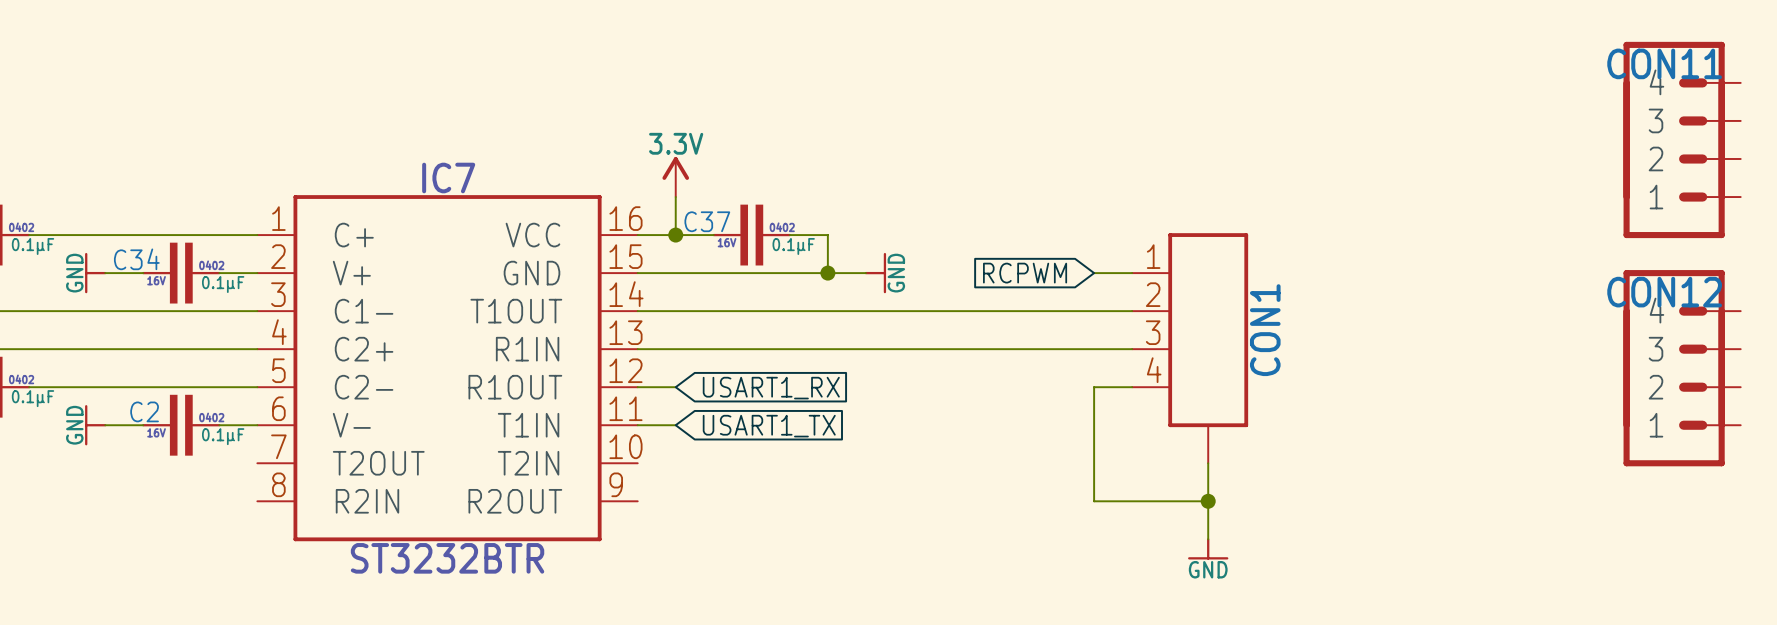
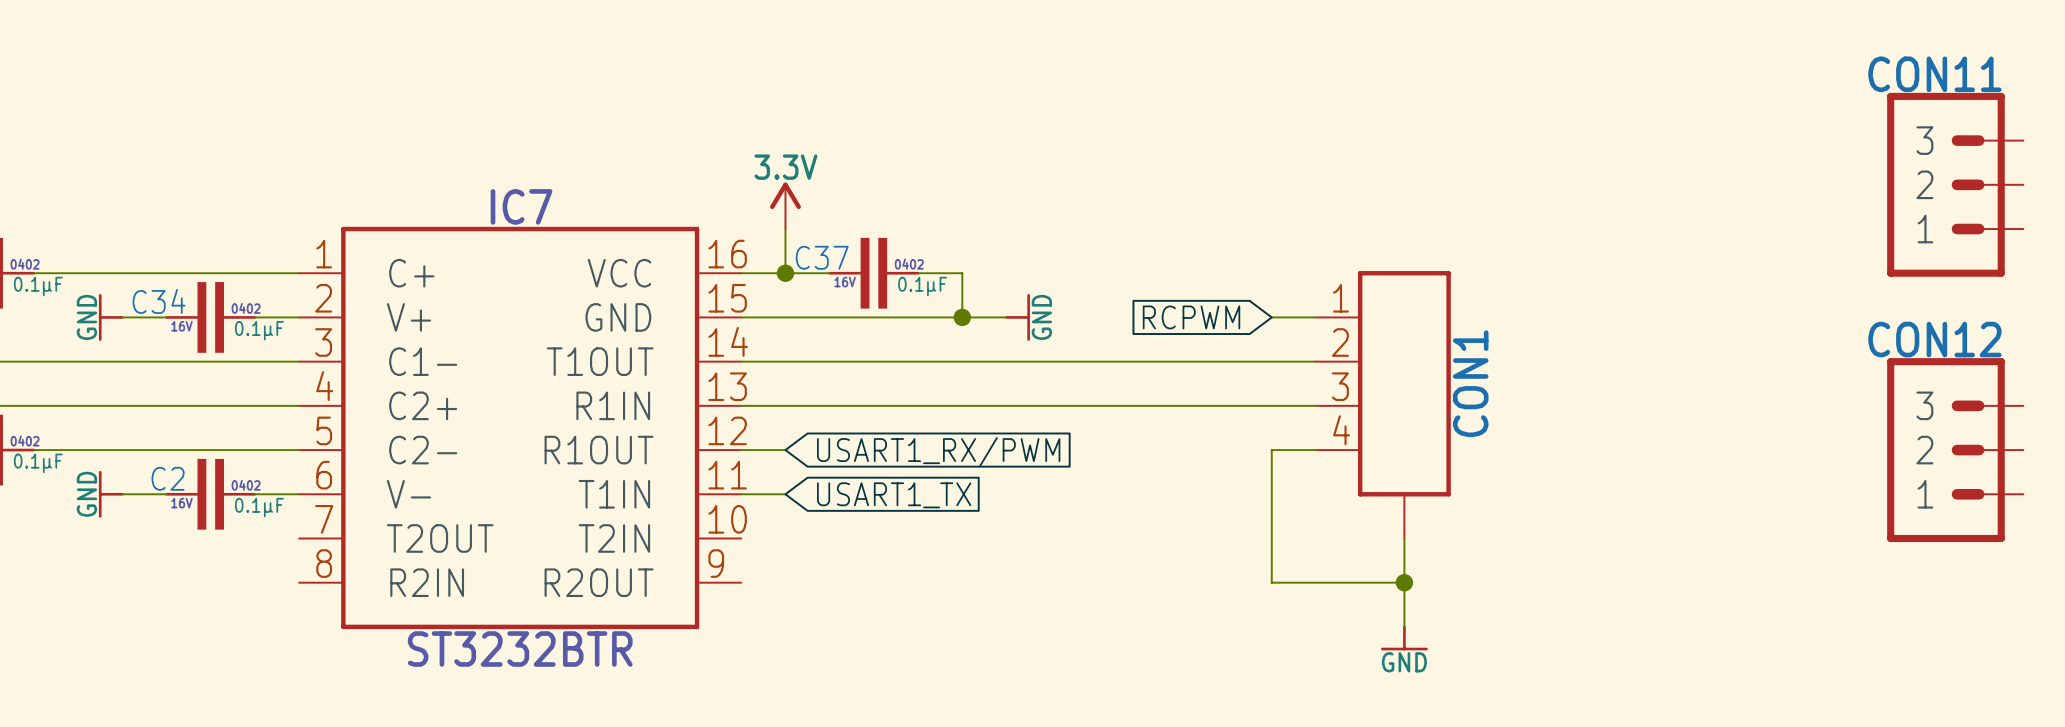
CON11 symbol: [1623, 41, 1741, 239] -> [1887, 92, 2024, 277]
CON12 symbol: [1623, 270, 1741, 467] -> [1887, 358, 2024, 543]
global label: USART1_RX (771, 388) -> USART1_RX/PWM (938, 452)

